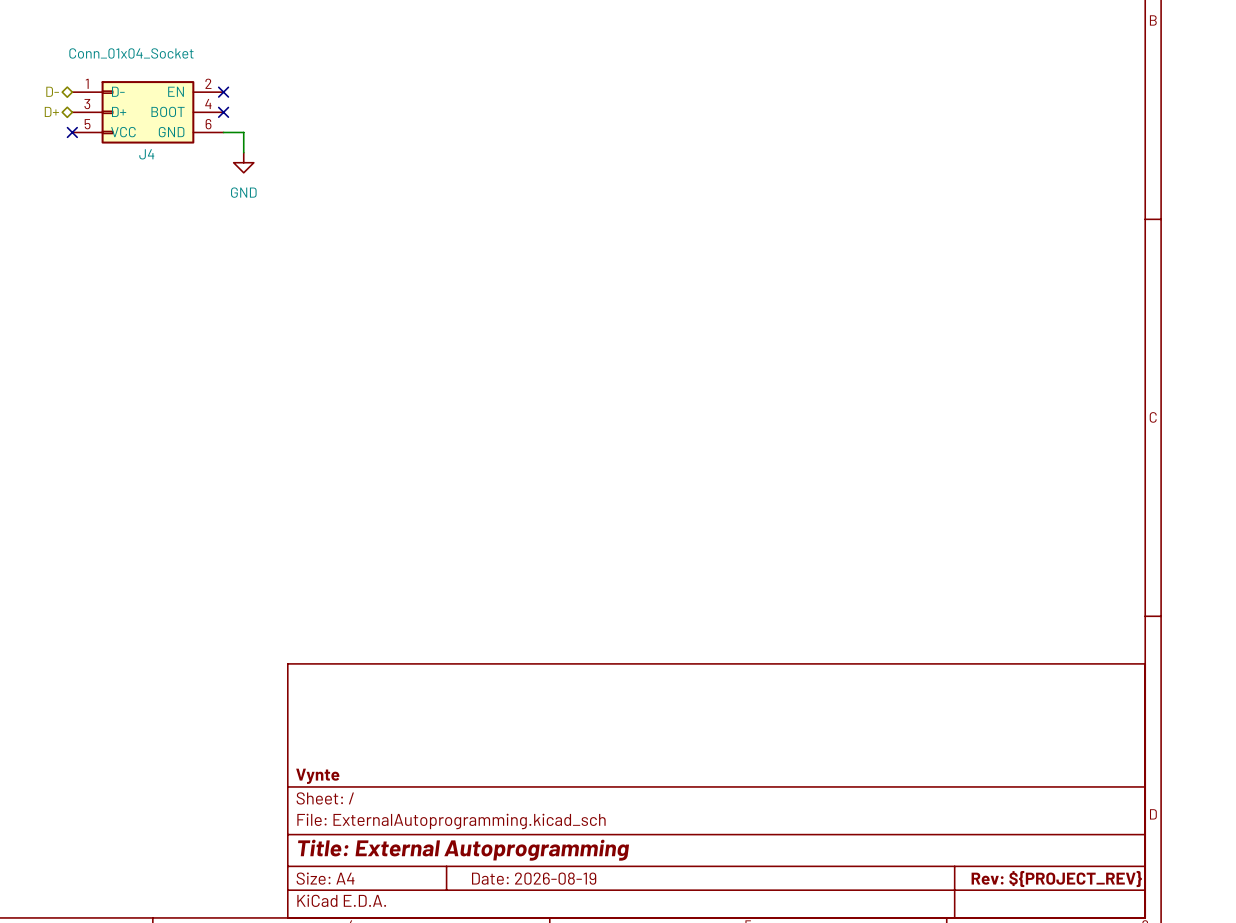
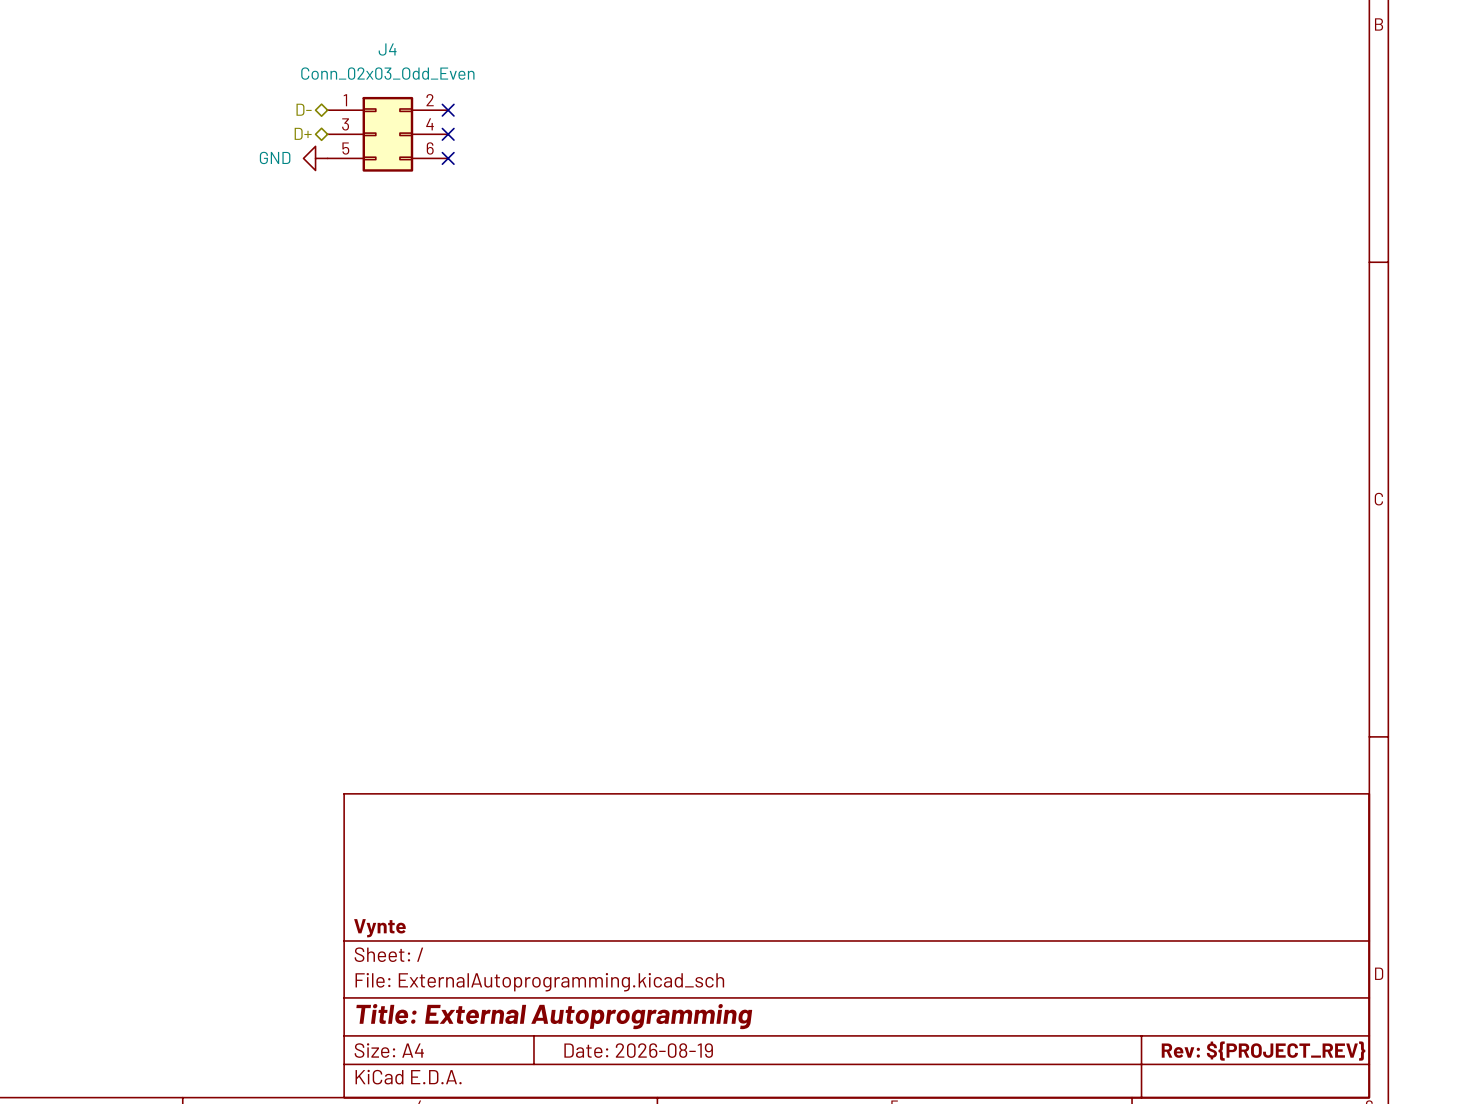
J4 value: Conn_01x04_Socket (131, 53) -> Conn_02x03_Odd_Even (387, 73)
J4 symbol: [72, 81, 224, 144] -> [327, 96, 449, 172]
hierarchical label: D- (52, 91) -> none
hierarchical label: none -> D- (304, 109)
no-connect mark: (223, 92) -> none
no-connect mark: none -> (448, 110)
hierarchical label: D+ (51, 111) -> none
hierarchical label: none -> D+ (303, 133)
no-connect mark: (223, 112) -> none
no-connect mark: none -> (448, 134)
no-connect mark: (72, 132) -> none
wire: (223, 132) (243, 132) (243, 152) -> none
no-connect mark: none -> (448, 158)
J4 name position: J4 (146, 154) -> J4 (387, 49)
power symbol rotation: 0° (243, 162) -> 90° clockwise (315, 158)
power symbol position: GND (243, 162) -> GND (315, 158)

